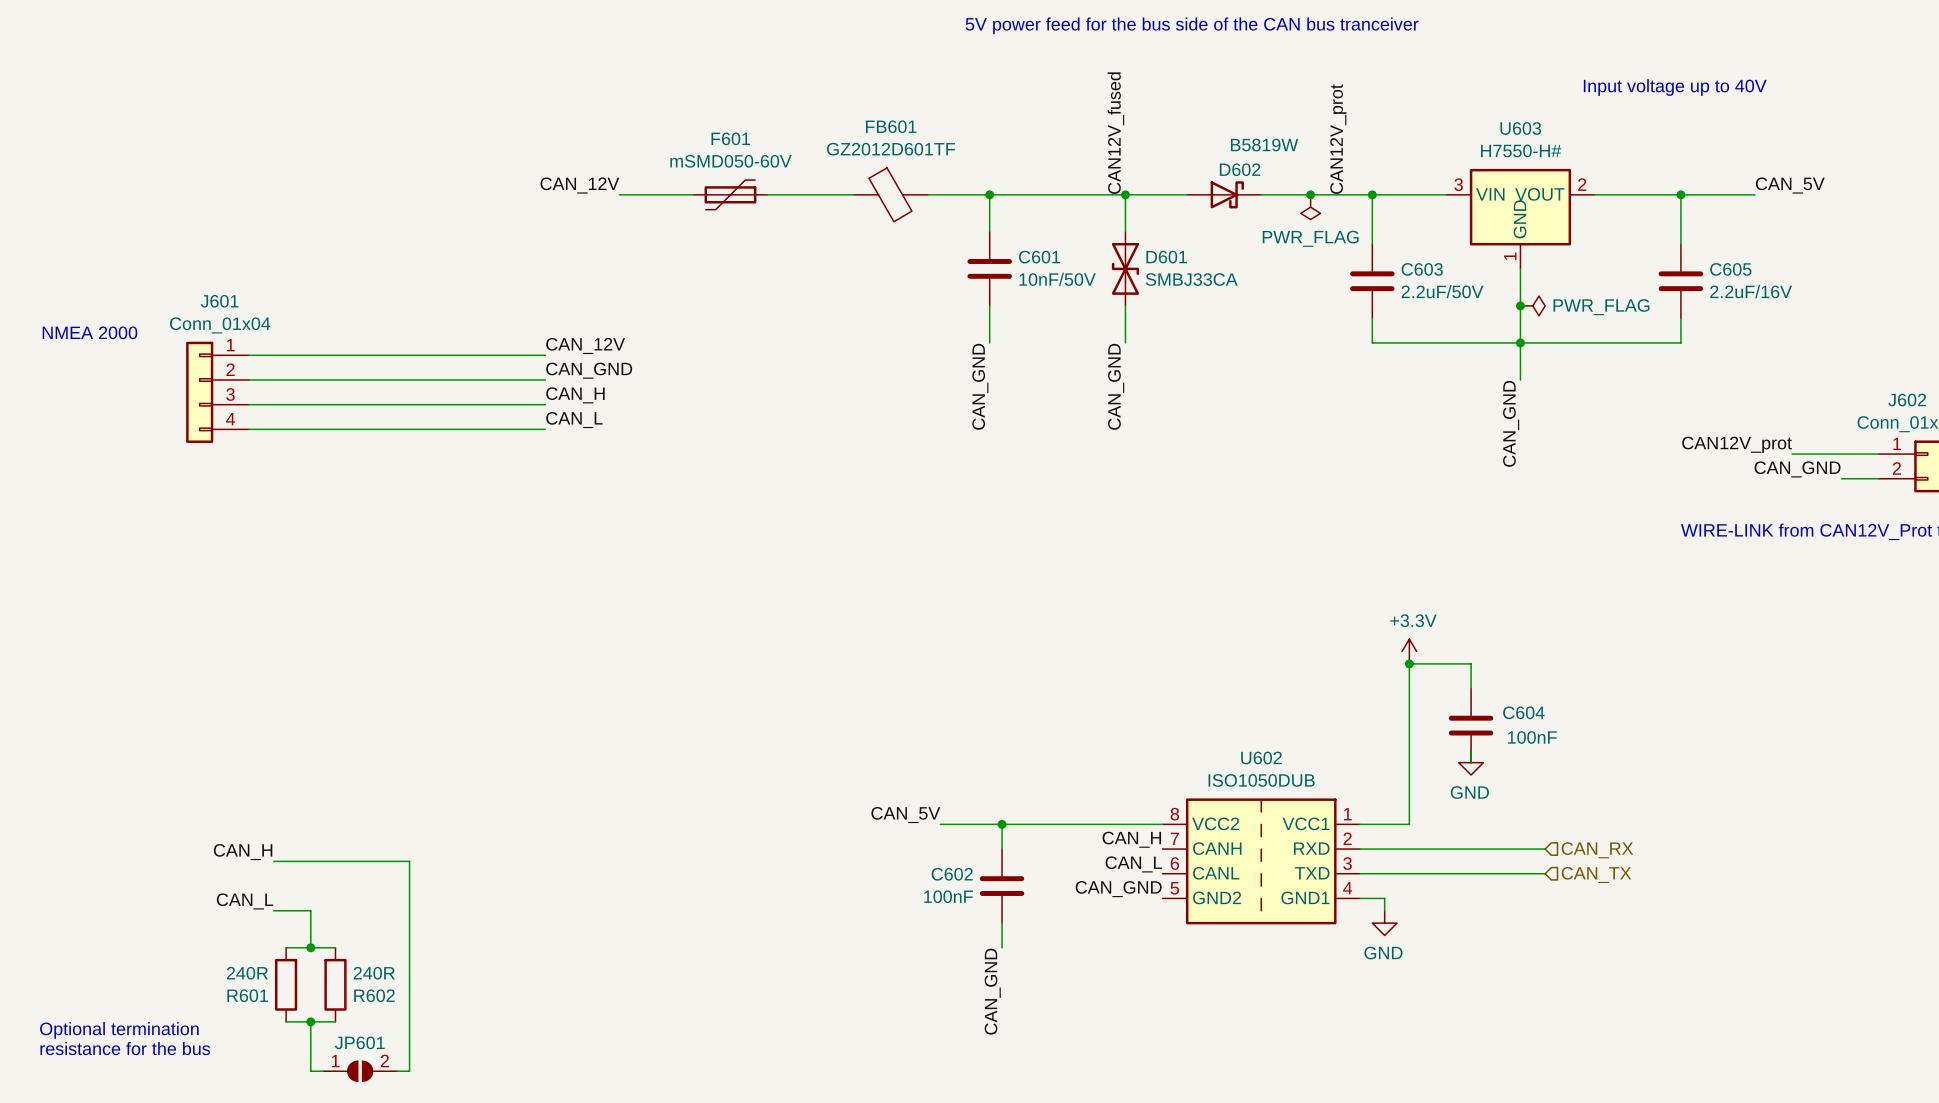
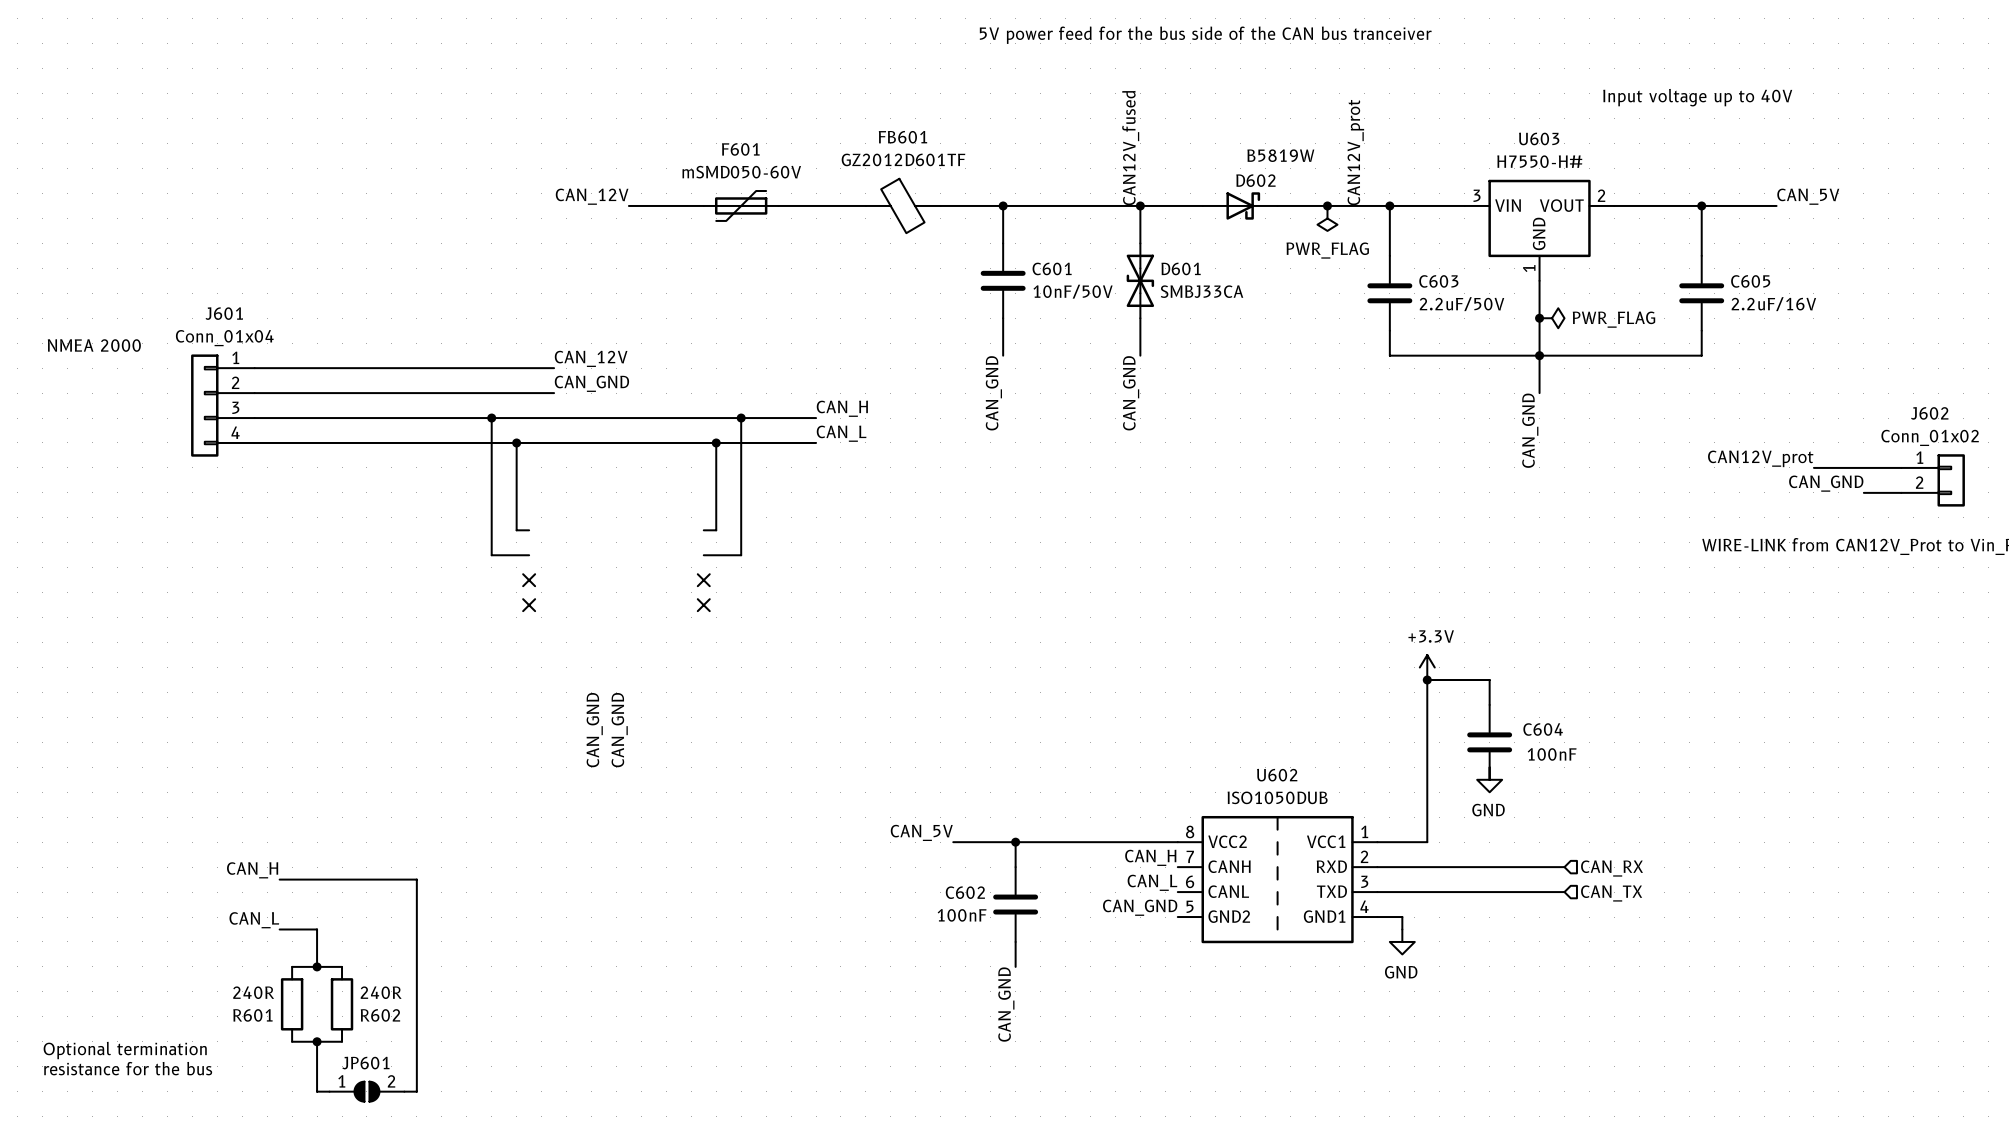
label: CAN_H (575, 395) -> none
label: none -> CAN_H (842, 408)
wire: none -> (491, 418) (491, 555) (529, 555)
junction: none -> (491, 418)
wire: none -> (554, 418) (816, 418)
wire: none -> (741, 418) (741, 555) (703, 555)
junction: none -> (741, 418)
label: CAN_L (574, 420) -> none
label: none -> CAN_L (841, 433)
wire: none -> (516, 442) (516, 530) (529, 530)
junction: none -> (516, 442)
wire: none -> (554, 442) (816, 442)
wire: none -> (716, 442) (716, 530) (703, 530)
junction: none -> (716, 442)
no-connect mark: none -> (529, 580)
no-connect mark: none -> (703, 580)
no-connect mark: none -> (529, 605)
no-connect mark: none -> (703, 605)
label: none -> CAN_GND (594, 730)
label: none -> CAN_GND (619, 730)

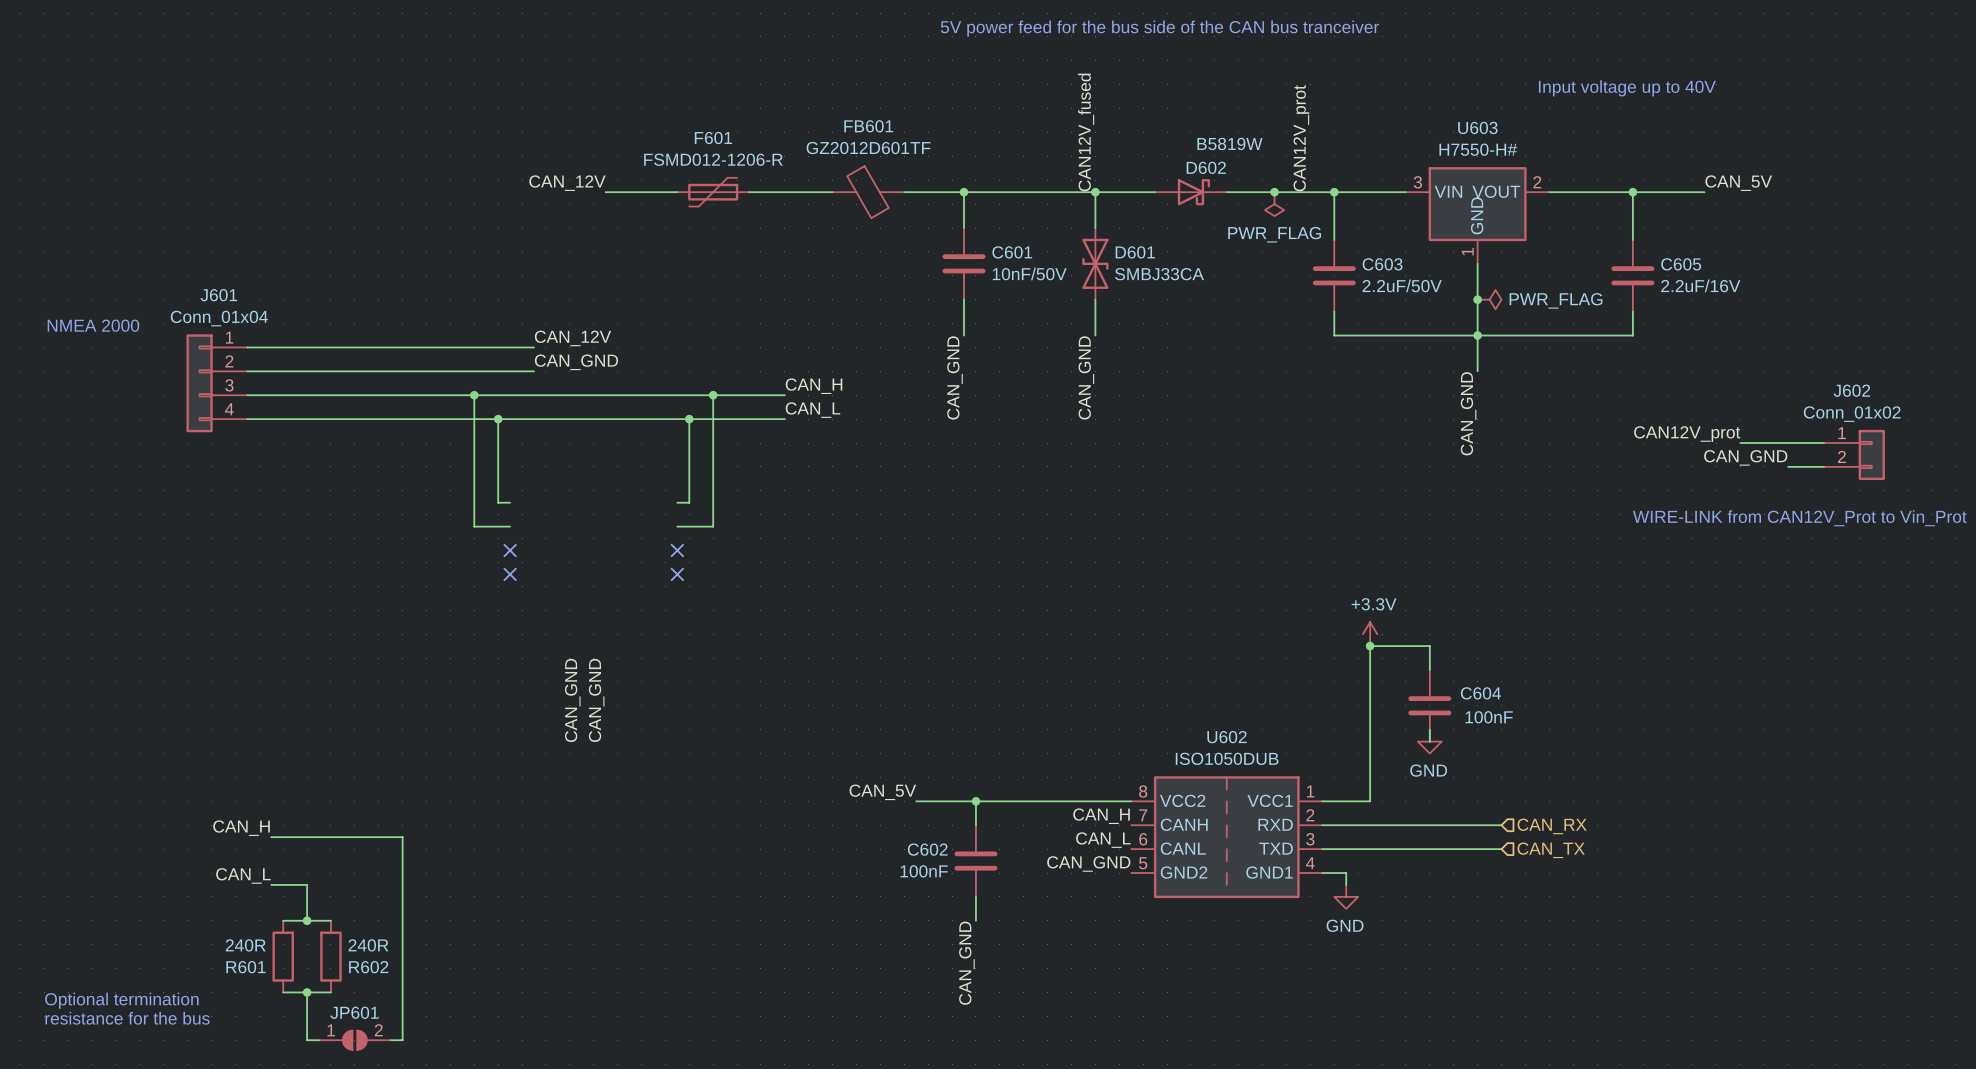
F601 value: mSMD050-60V (741, 172) -> FSMD012-1206-R (713, 159)

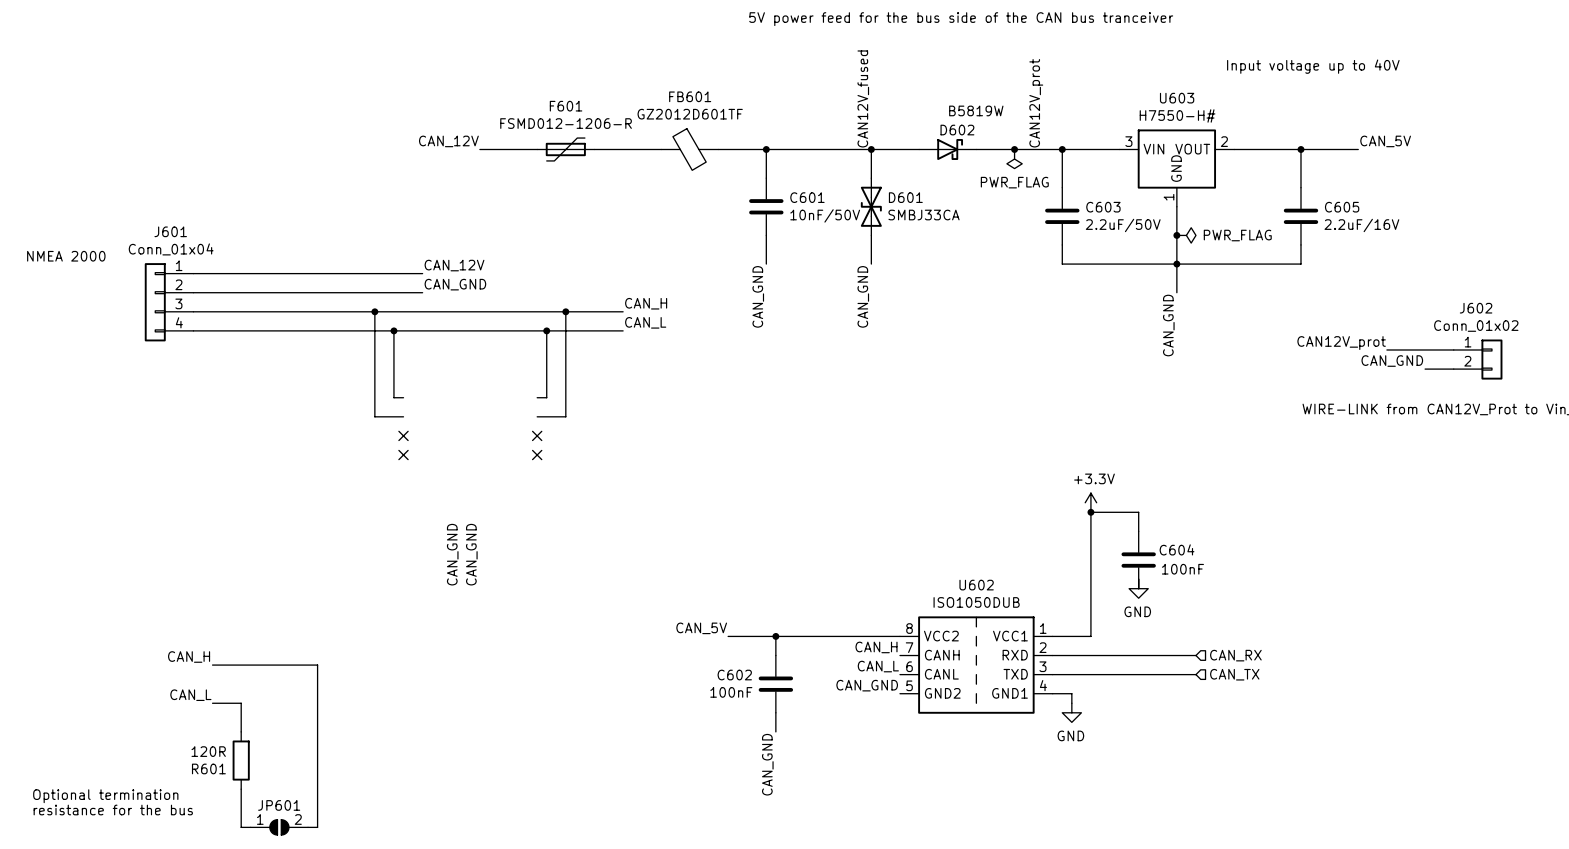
wire: (283, 920) (330, 920) -> none
junction: (307, 920) -> none
R601 value: 240R (245, 945) -> 120R (208, 751)
R601 position: (283, 956) -> (241, 760)
R602: 240R (330, 956) -> none
wire: (283, 992) (330, 992) -> none
junction: (307, 992) -> none

